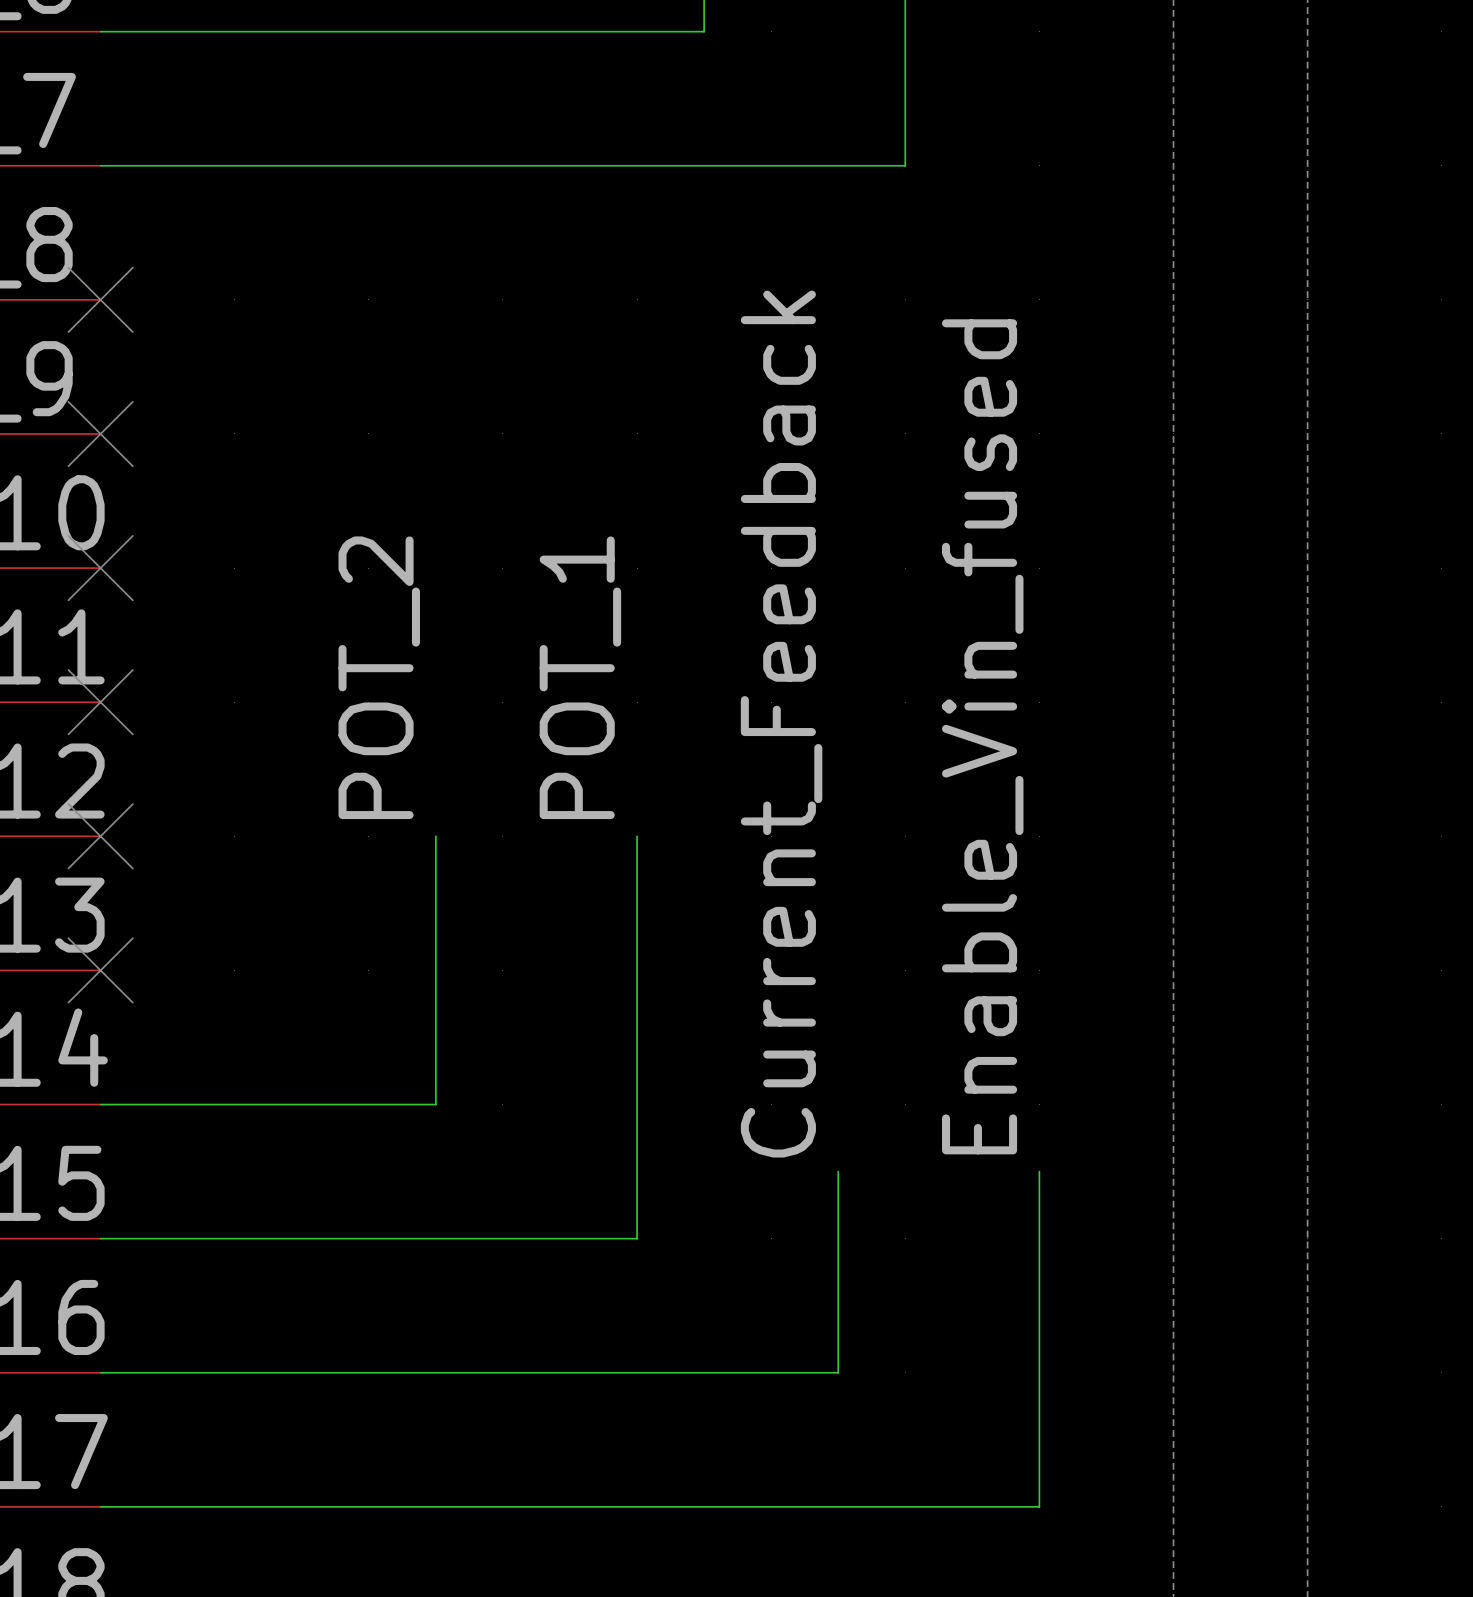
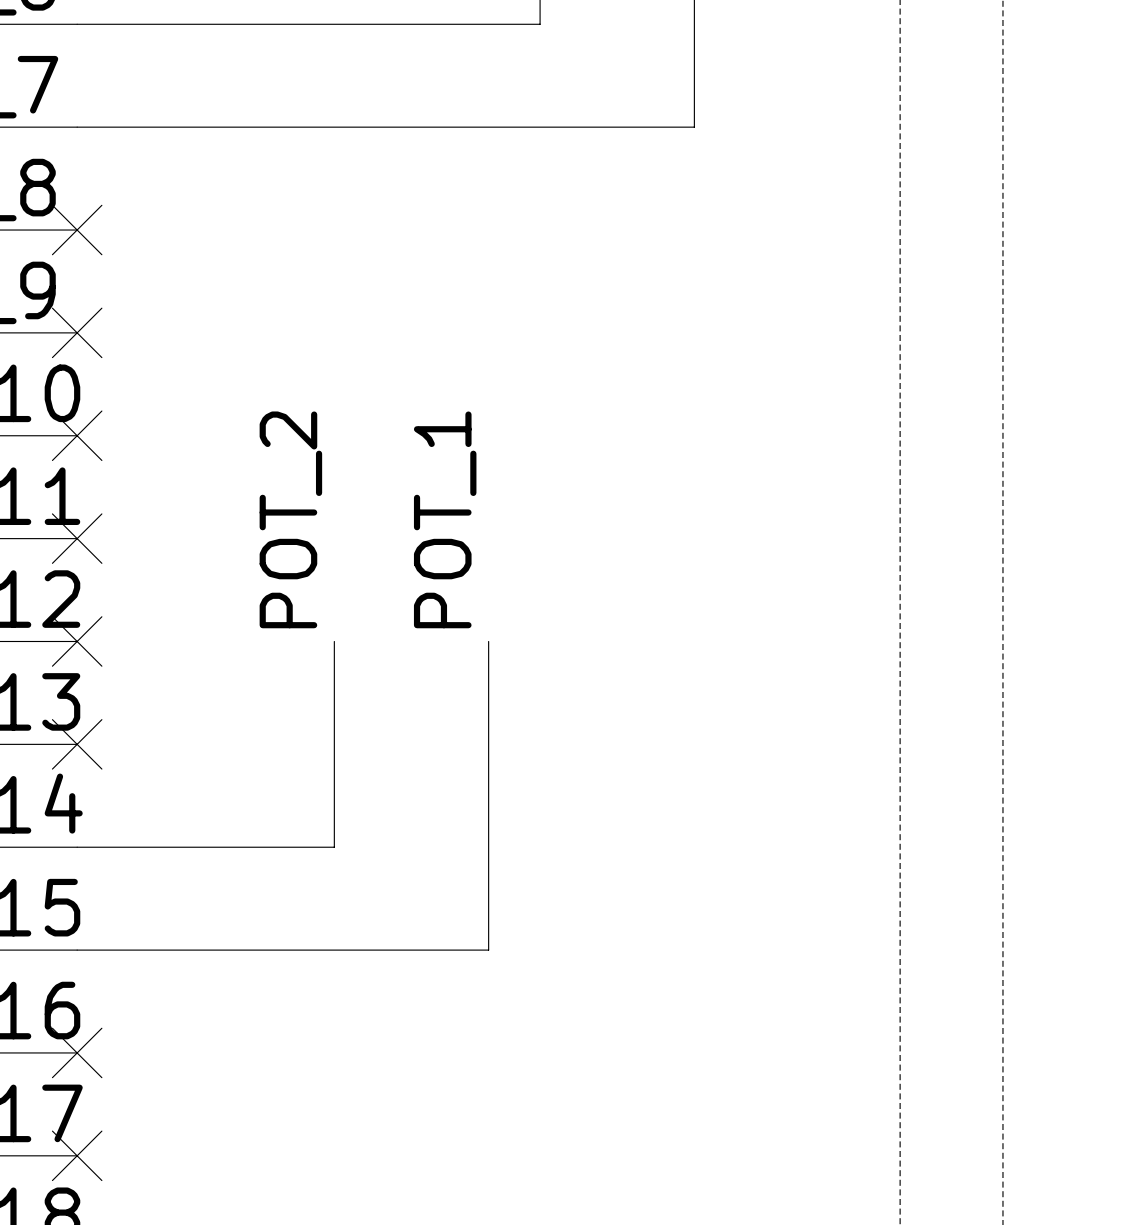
label: Current_Feedback (781, 724) -> none
label: Enable_Vin_fused (982, 736) -> none
wire: (838, 1171) (838, 1372) (100, 1372) -> none
wire: (1039, 1171) (1039, 1506) (100, 1506) -> none
no-connect mark: none -> (77, 1052)
no-connect mark: none -> (77, 1155)

